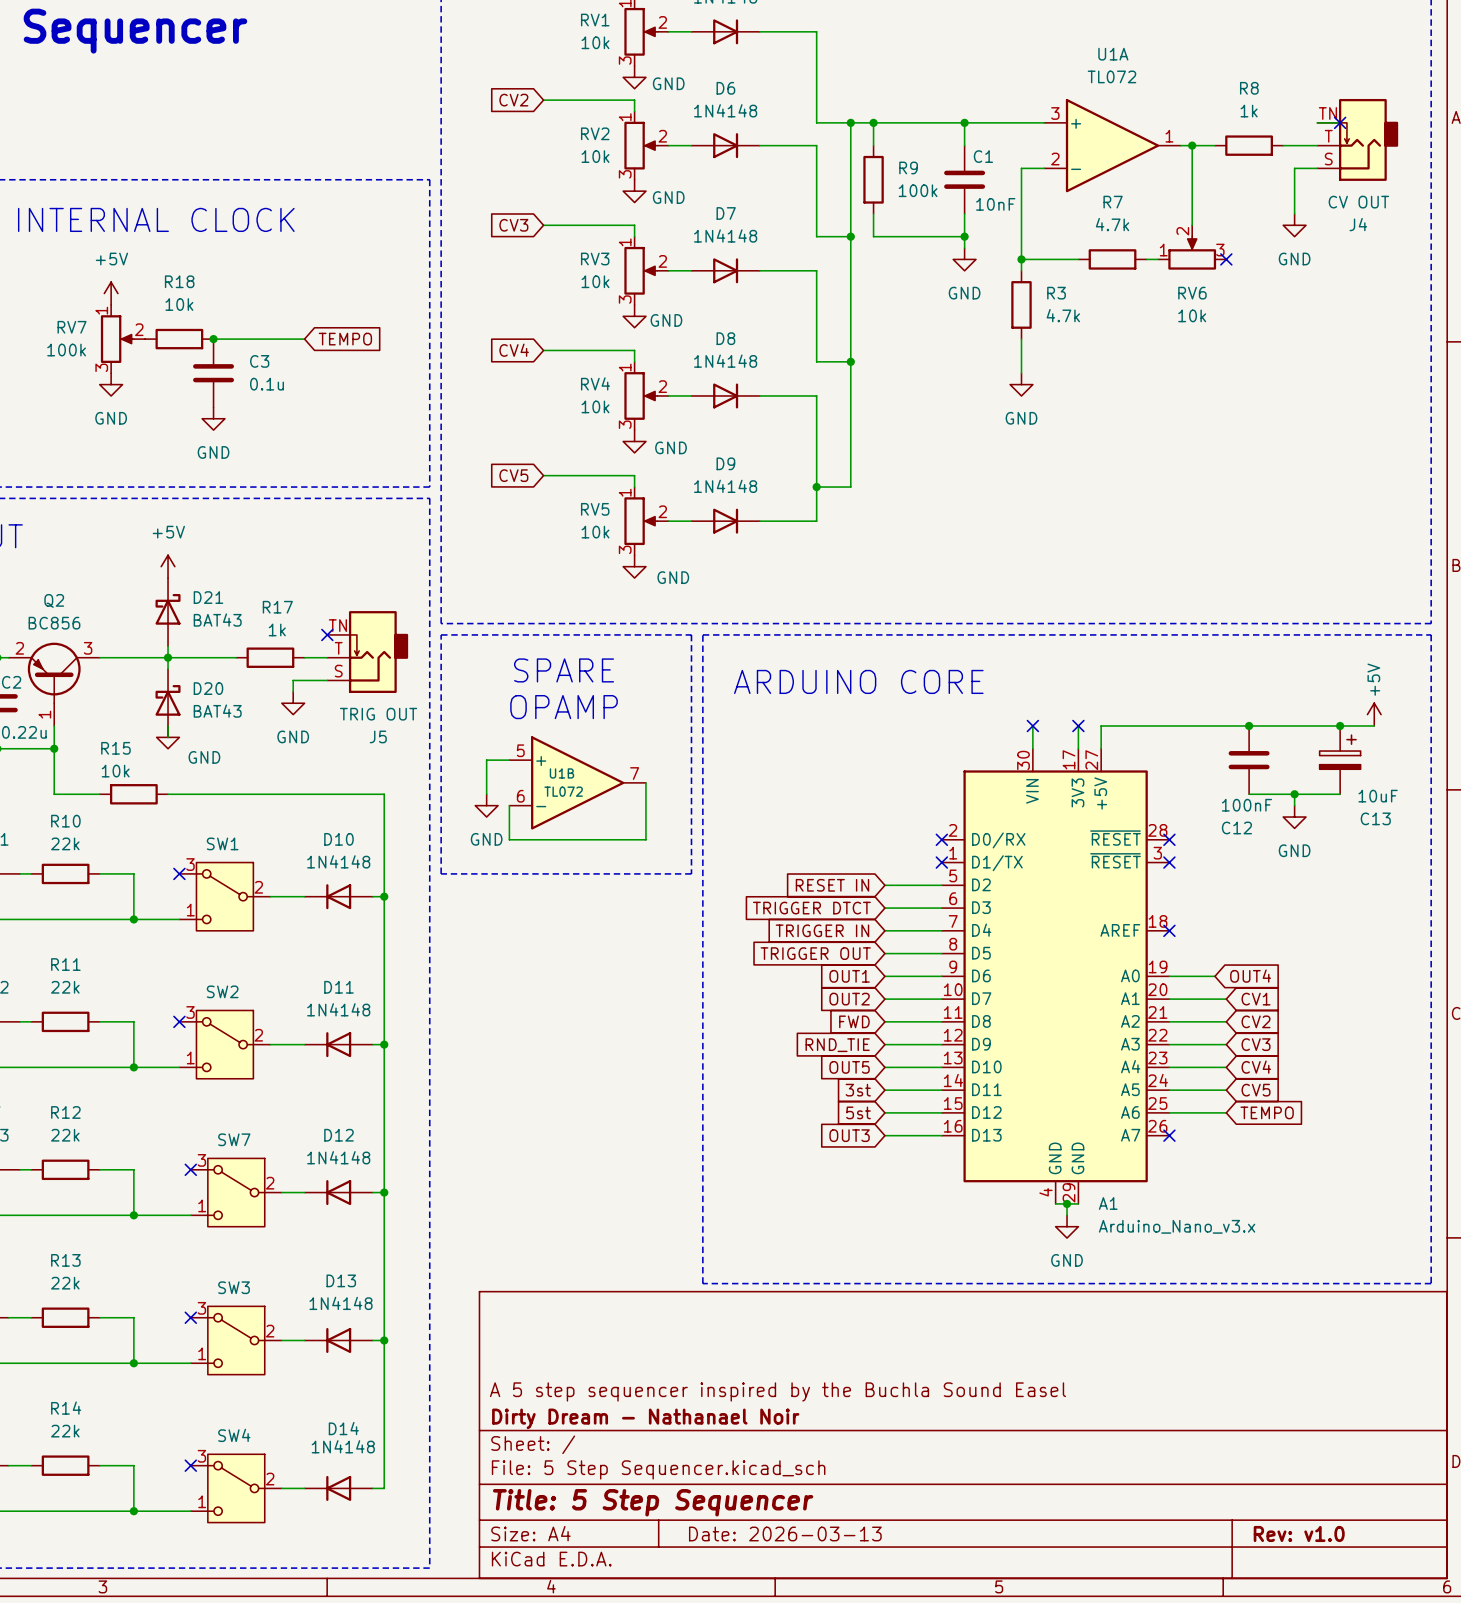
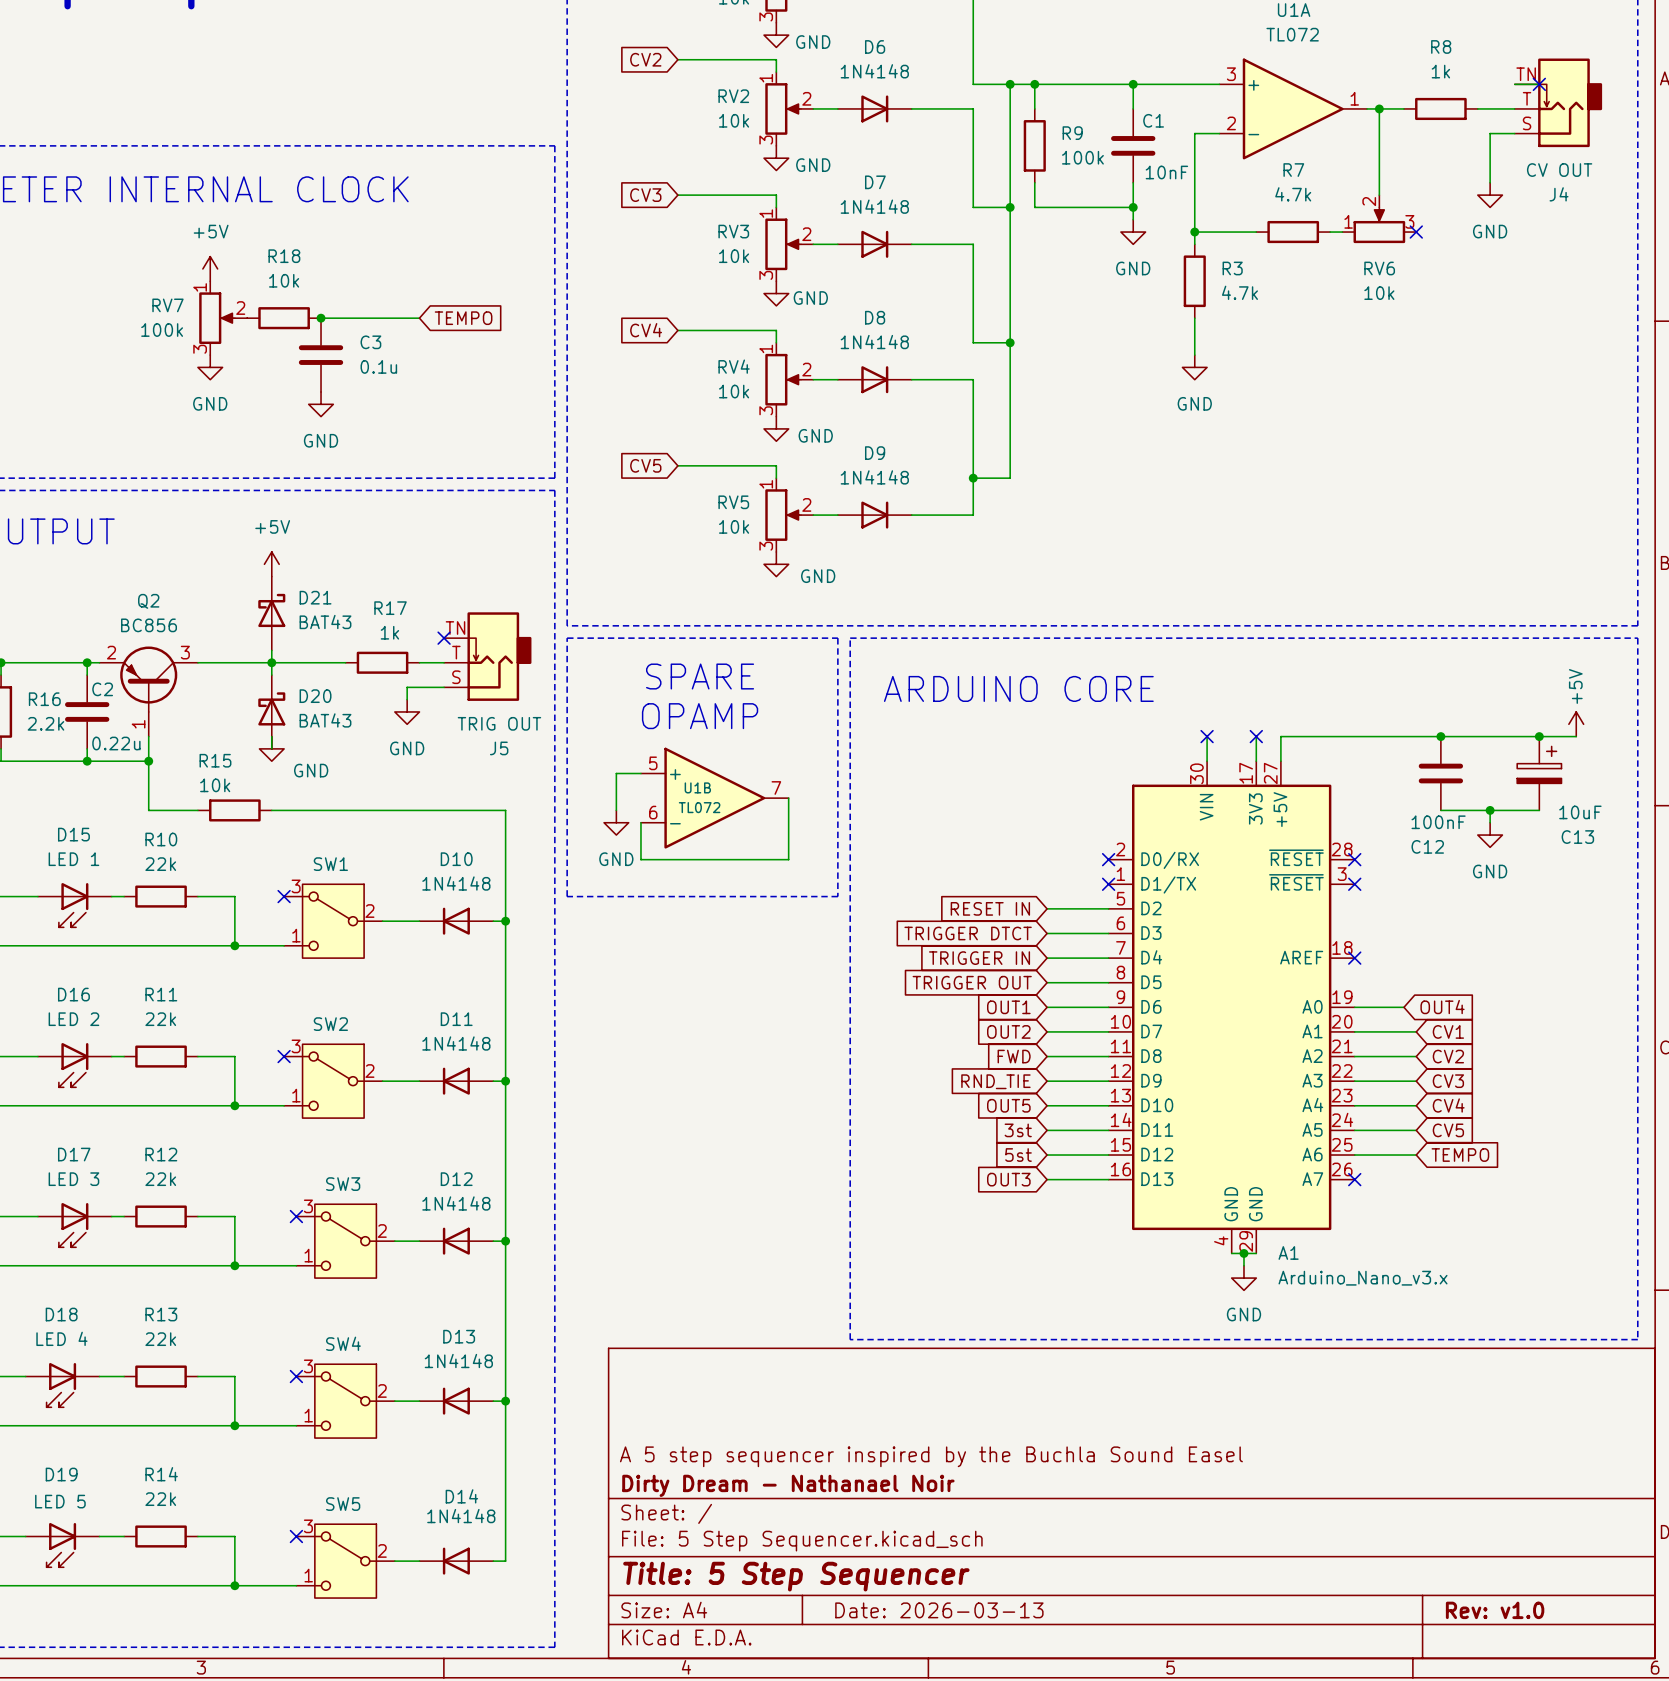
SW7 name: SW7 (234, 1139) -> SW3 (343, 1184)
SW3 name: SW3 (234, 1287) -> SW4 (343, 1343)
SW4 name: SW4 (234, 1435) -> SW5 (343, 1504)

